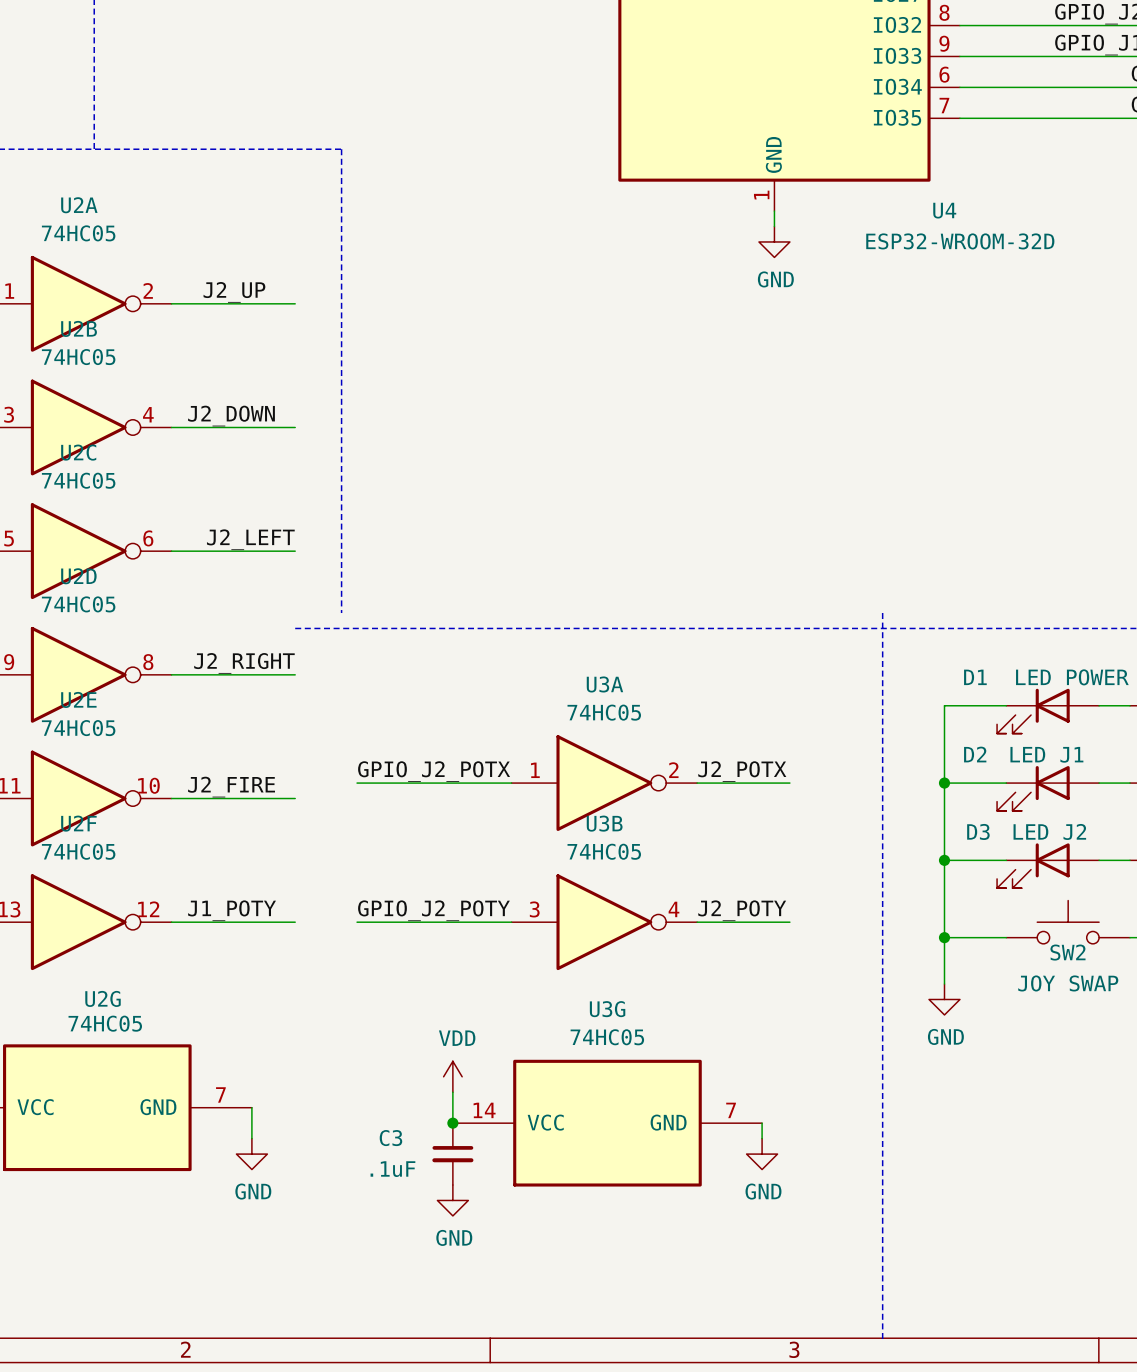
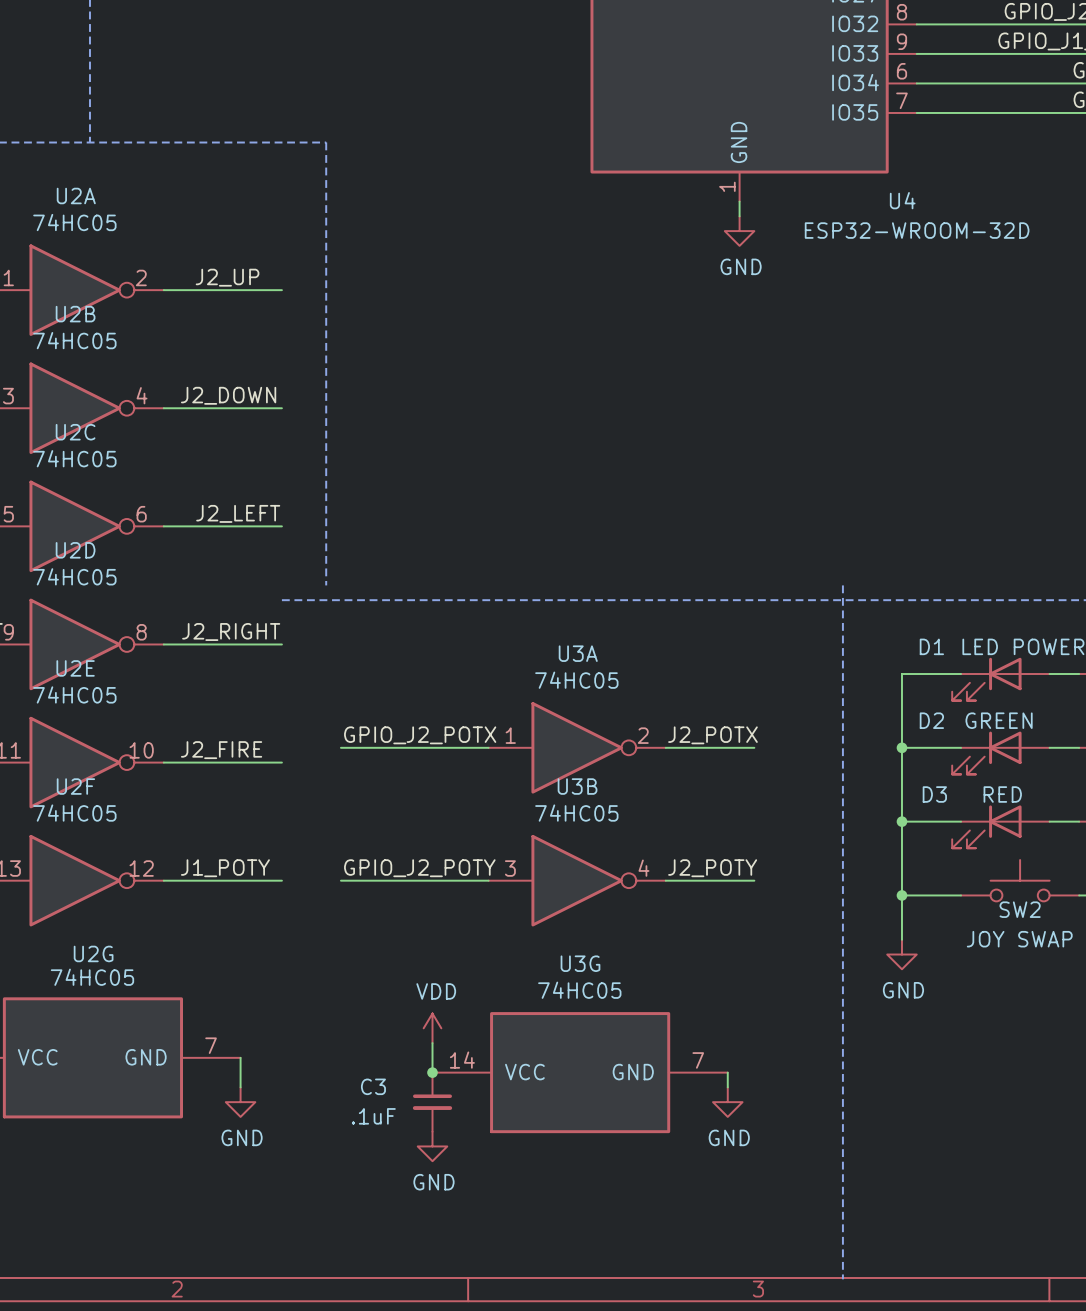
D2 value: LED J1 (1046, 754) -> GREEN (999, 720)
D3 value: LED J2 (1049, 831) -> RED (1002, 794)

